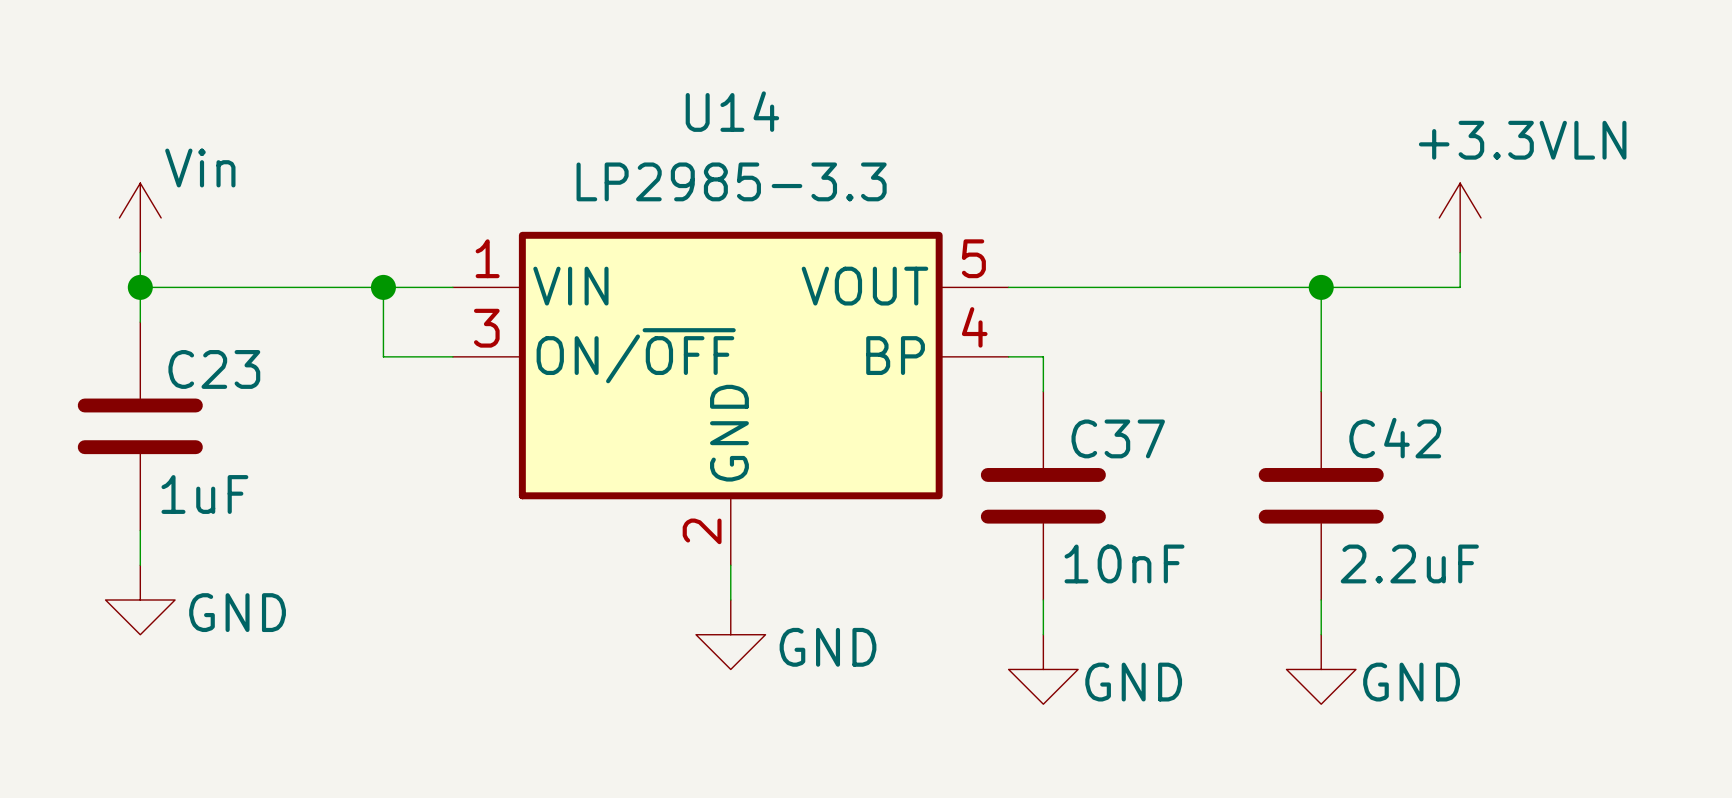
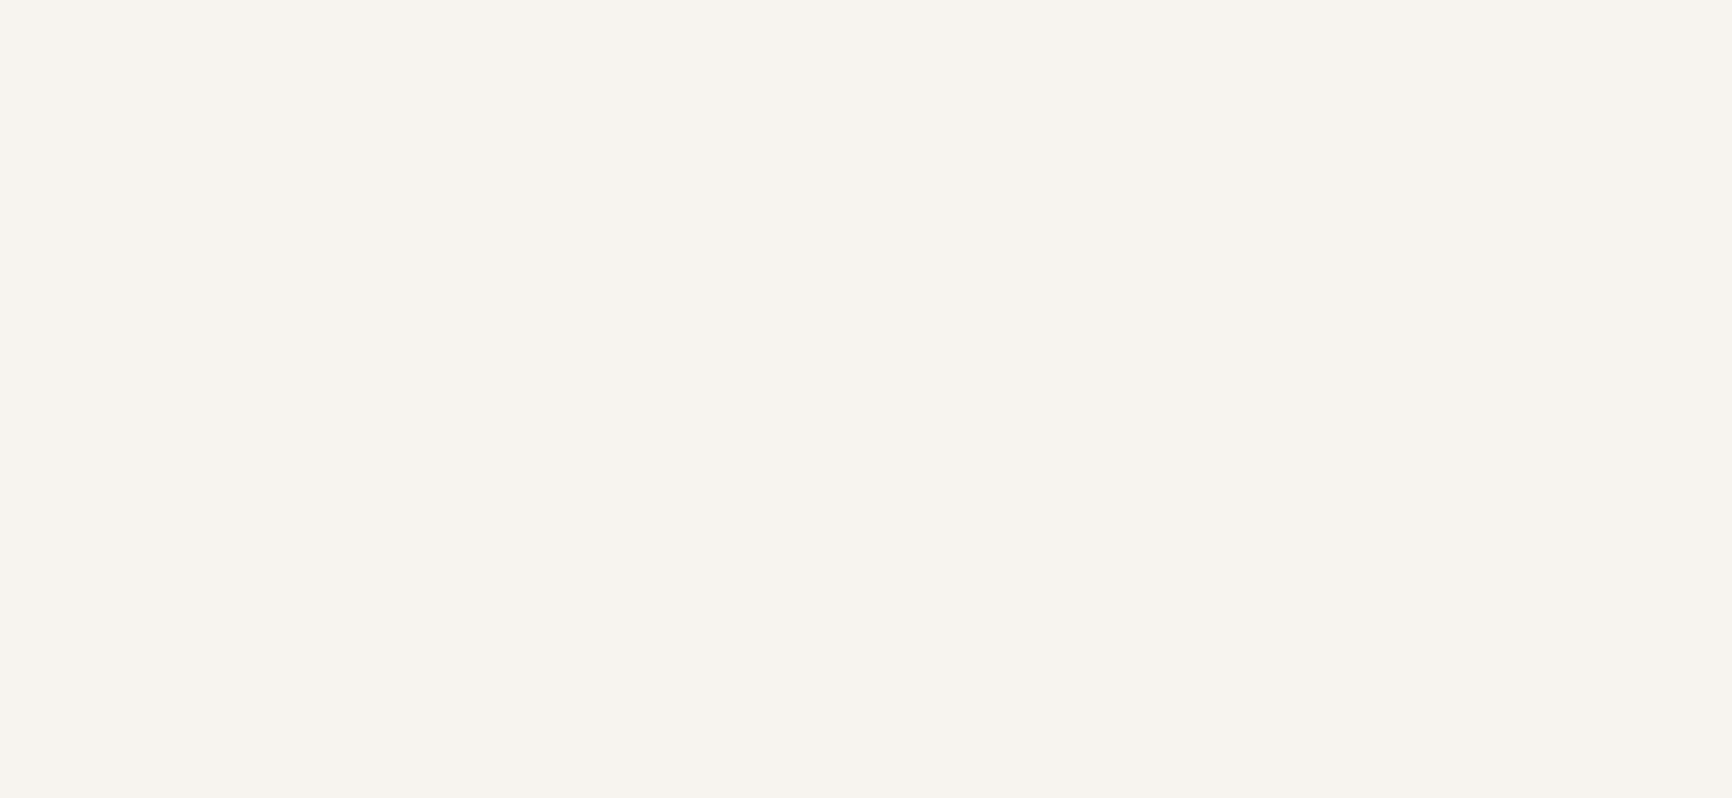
power symbol: Vin (140, 217) -> none
power symbol: +3.3VLN (1460, 217) -> none
wire: (140, 252) (140, 322) -> none
wire: (1460, 252) (1460, 287) (1008, 287) -> none
wire: (140, 287) (452, 287) -> none
junction: (140, 287) -> none
wire: (383, 287) (383, 356) (452, 356) -> none
junction: (383, 287) -> none
wire: (1321, 287) (1321, 391) -> none
junction: (1321, 287) -> none
wire: (1008, 356) (1043, 356) (1043, 391) -> none
U14: LP2985-3.3 (730, 398) -> none
C23: 1uF (140, 426) -> none
C37: 10nF (1043, 495) -> none
C42: 2.2uF (1321, 495) -> none
wire: (140, 530) (140, 565) -> none
wire: (730, 565) (730, 599) -> none
power symbol: GND (140, 599) -> none
wire: (1043, 599) (1043, 634) -> none
wire: (1321, 599) (1321, 634) -> none
power symbol: GND (730, 634) -> none
power symbol: GND (1043, 669) -> none
power symbol: GND (1321, 669) -> none

